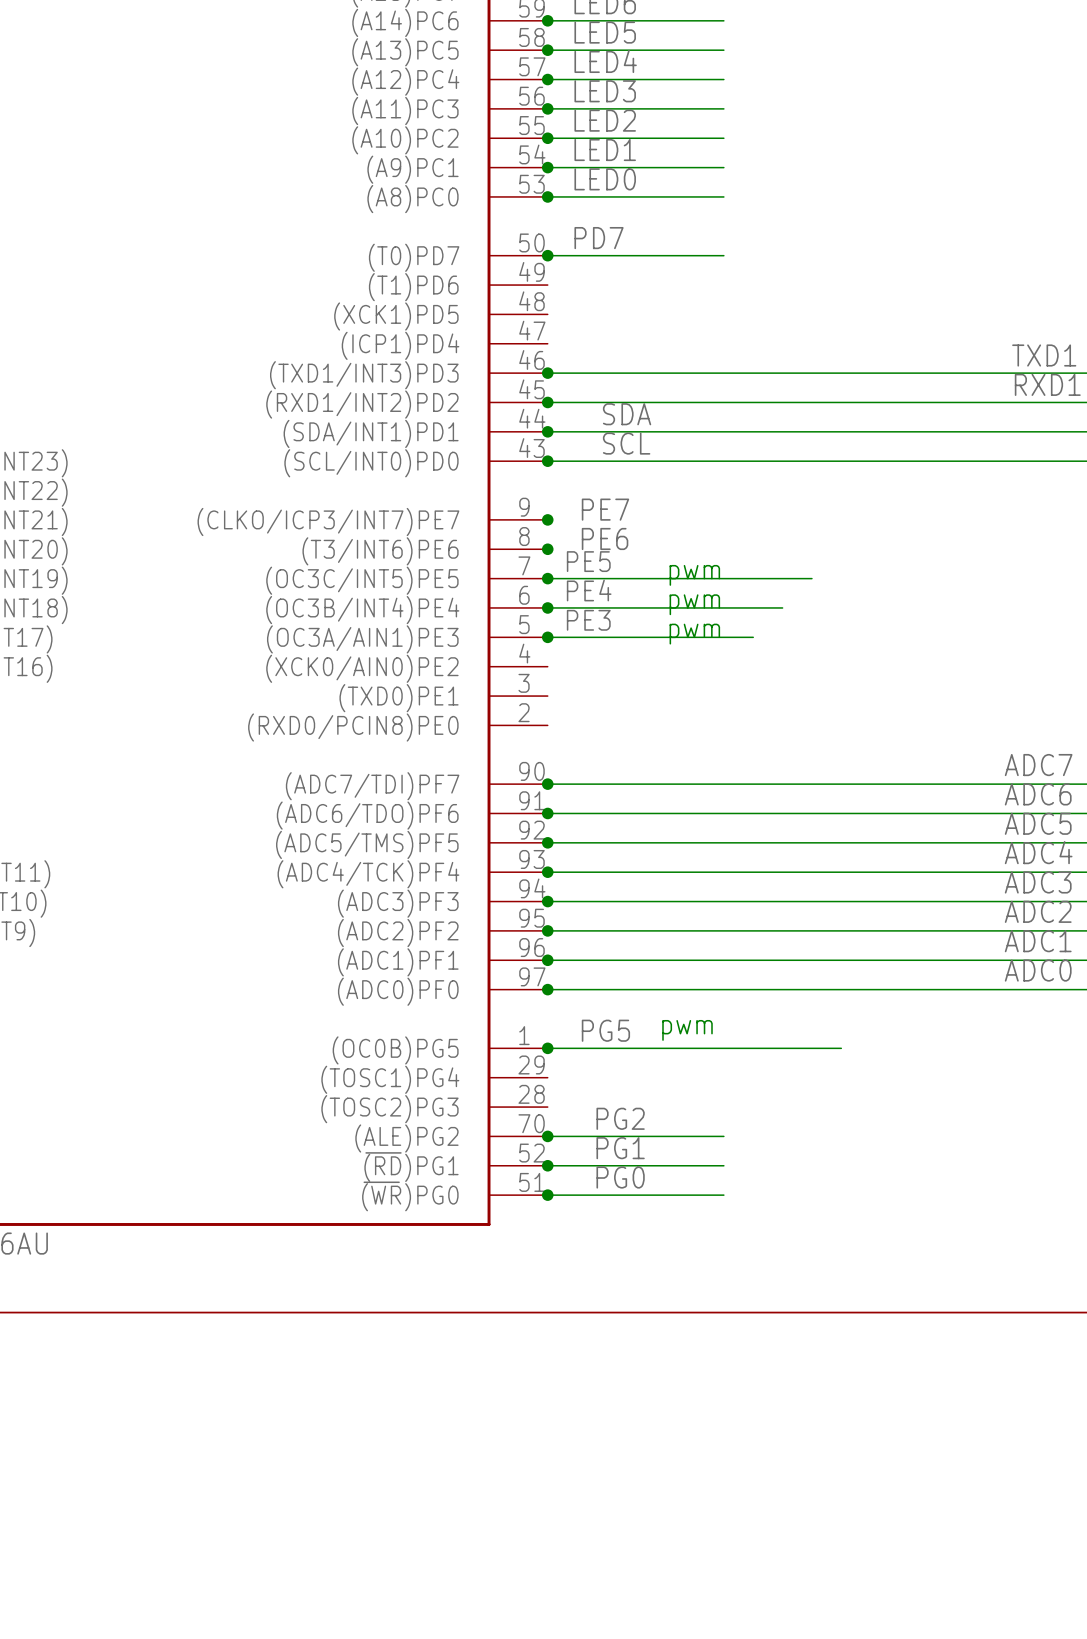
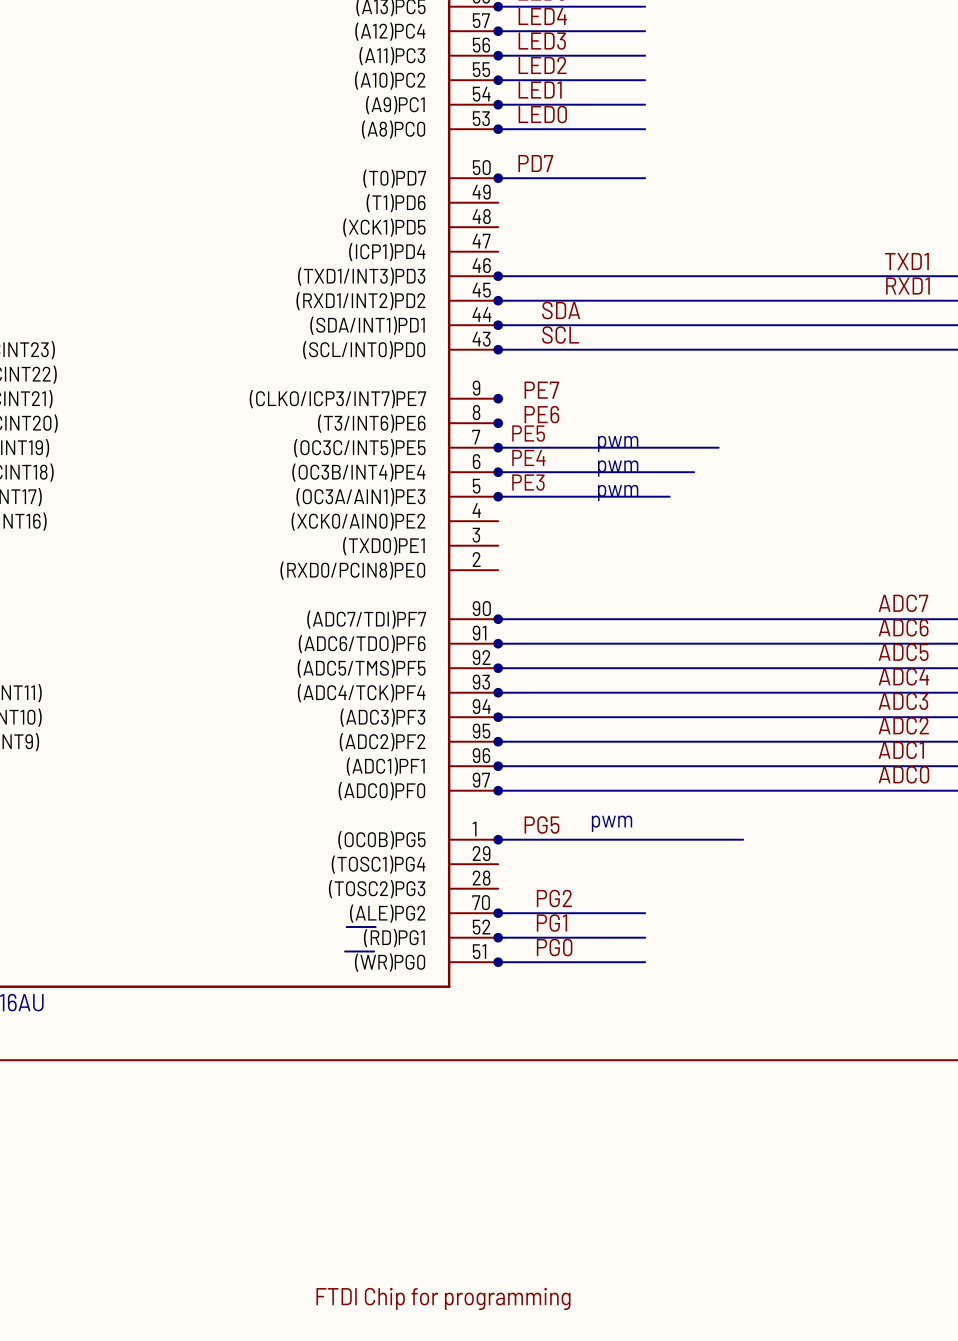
text: none -> FTDI Chip for programming (443, 1298)

